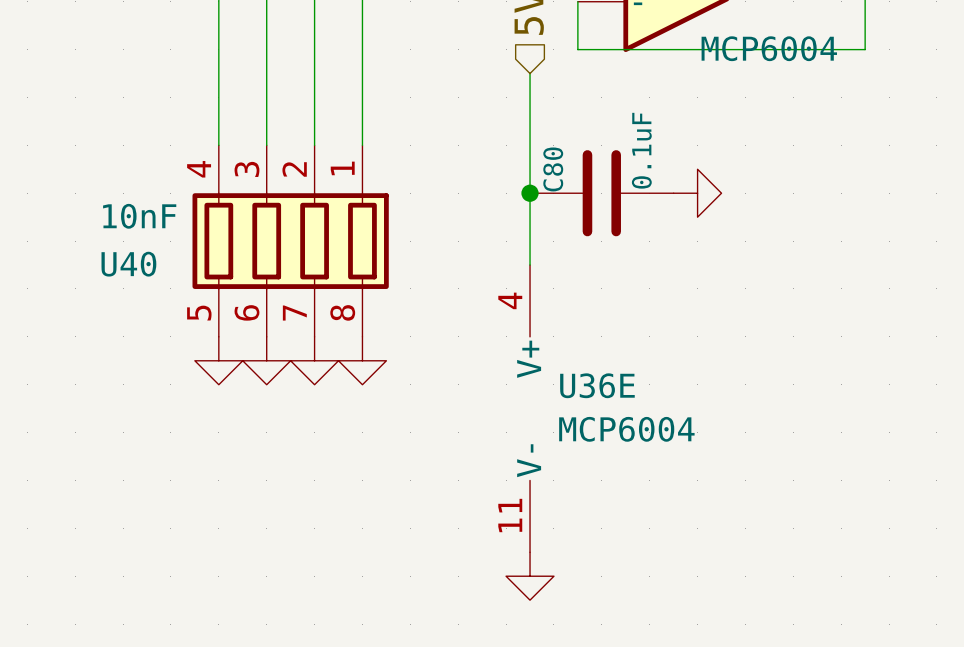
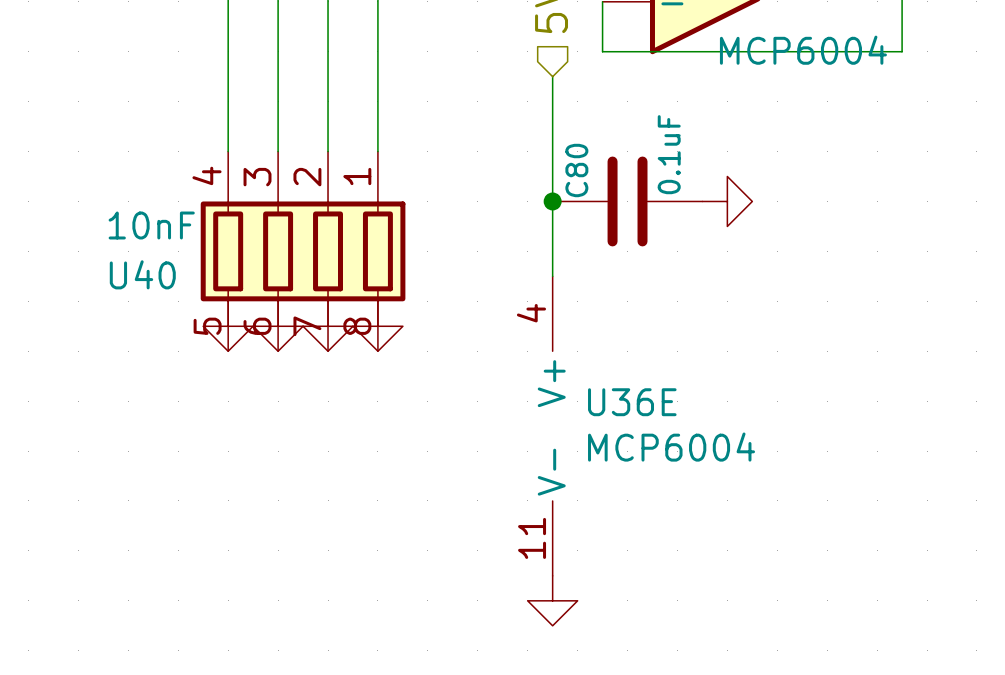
power symbol: none -> (228, 326)
power symbol: none -> (278, 326)
power symbol: none -> (328, 326)
power symbol: none -> (377, 326)
power symbol: (218, 360) -> none
power symbol: (266, 360) -> none
power symbol: (314, 360) -> none
power symbol: (362, 360) -> none

